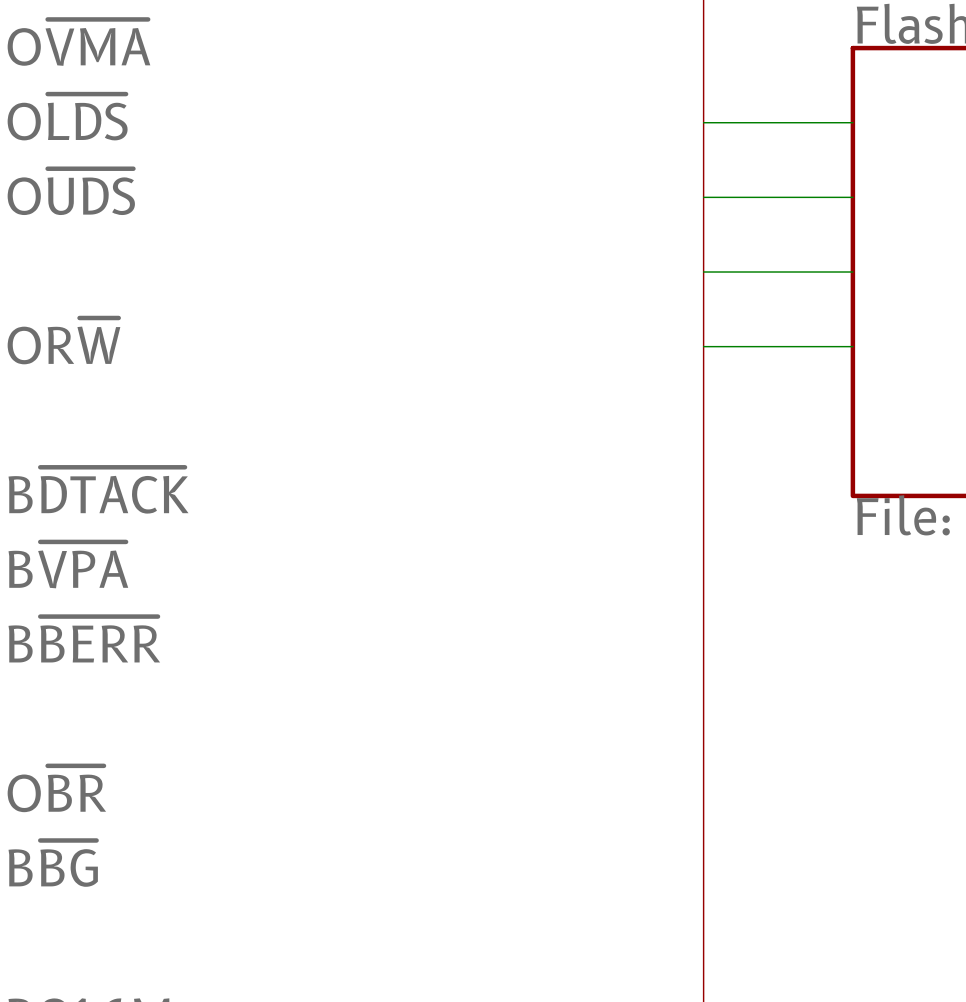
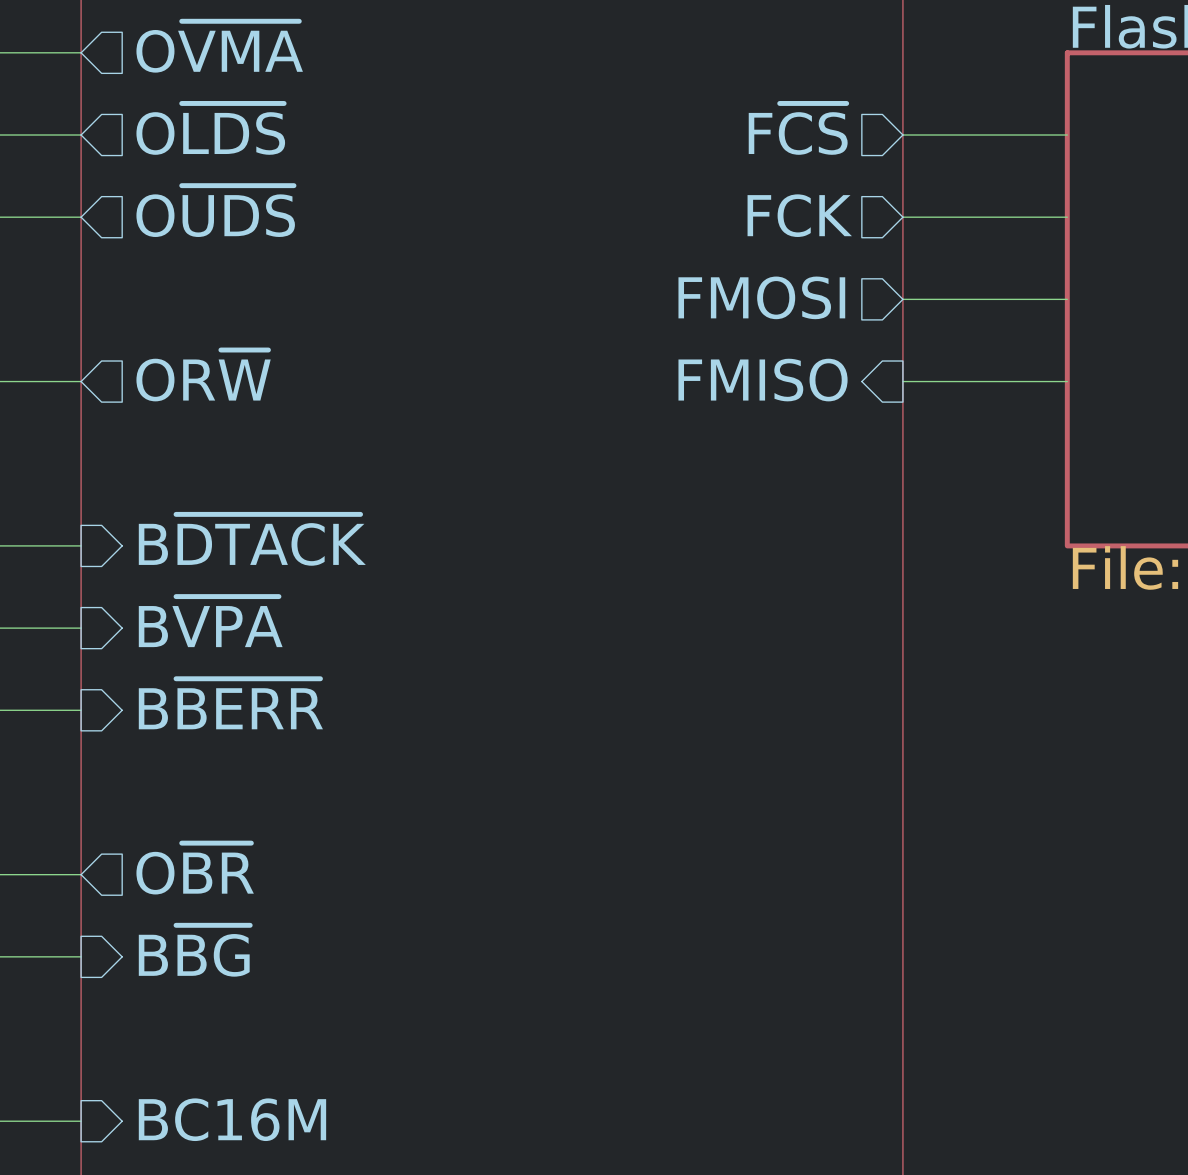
sheet pin: none -> F~{CS} (798, 129)
sheet pin: none -> FCK (799, 215)
sheet pin: none -> FMOSI (761, 297)
sheet pin: none -> FMISO (763, 380)

